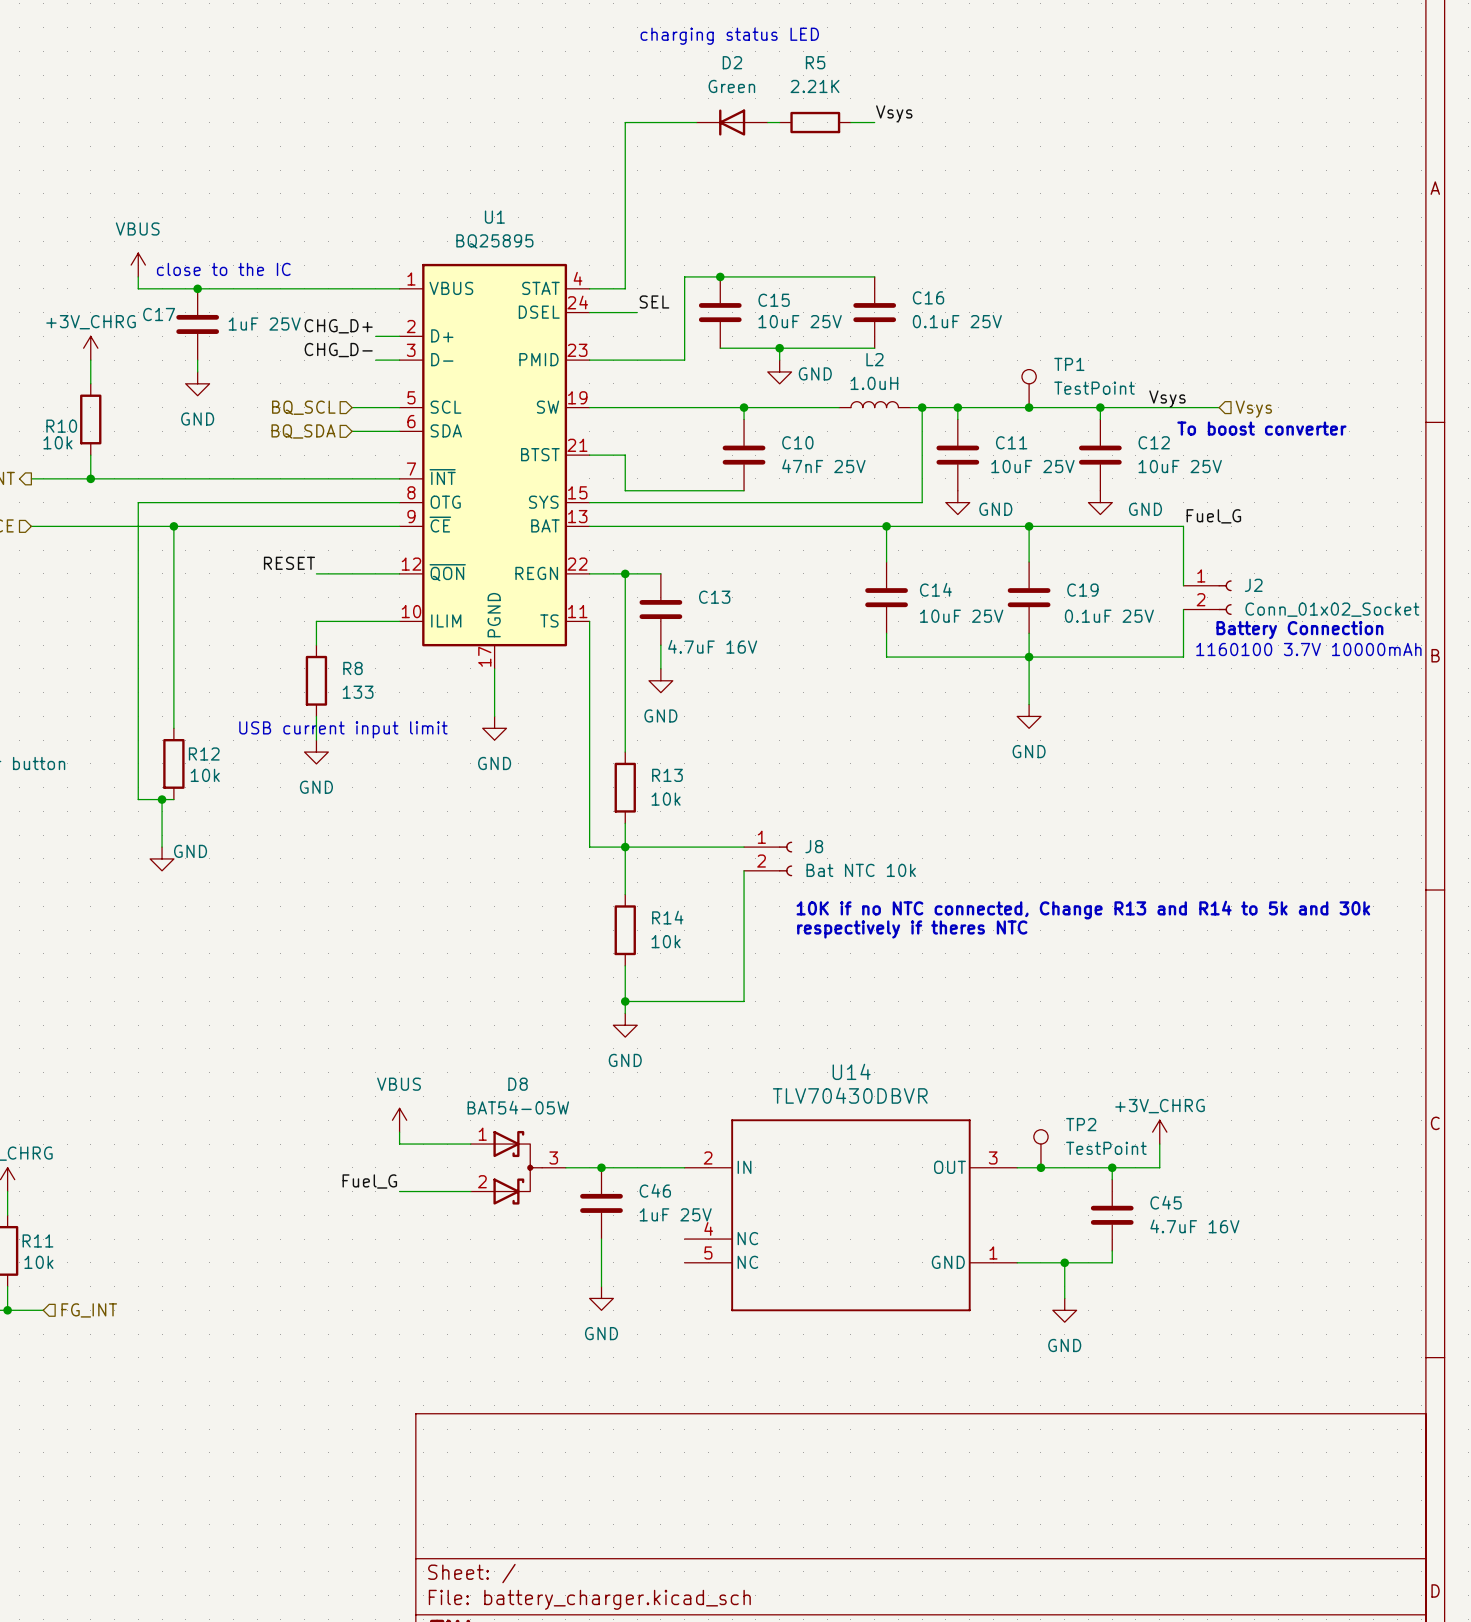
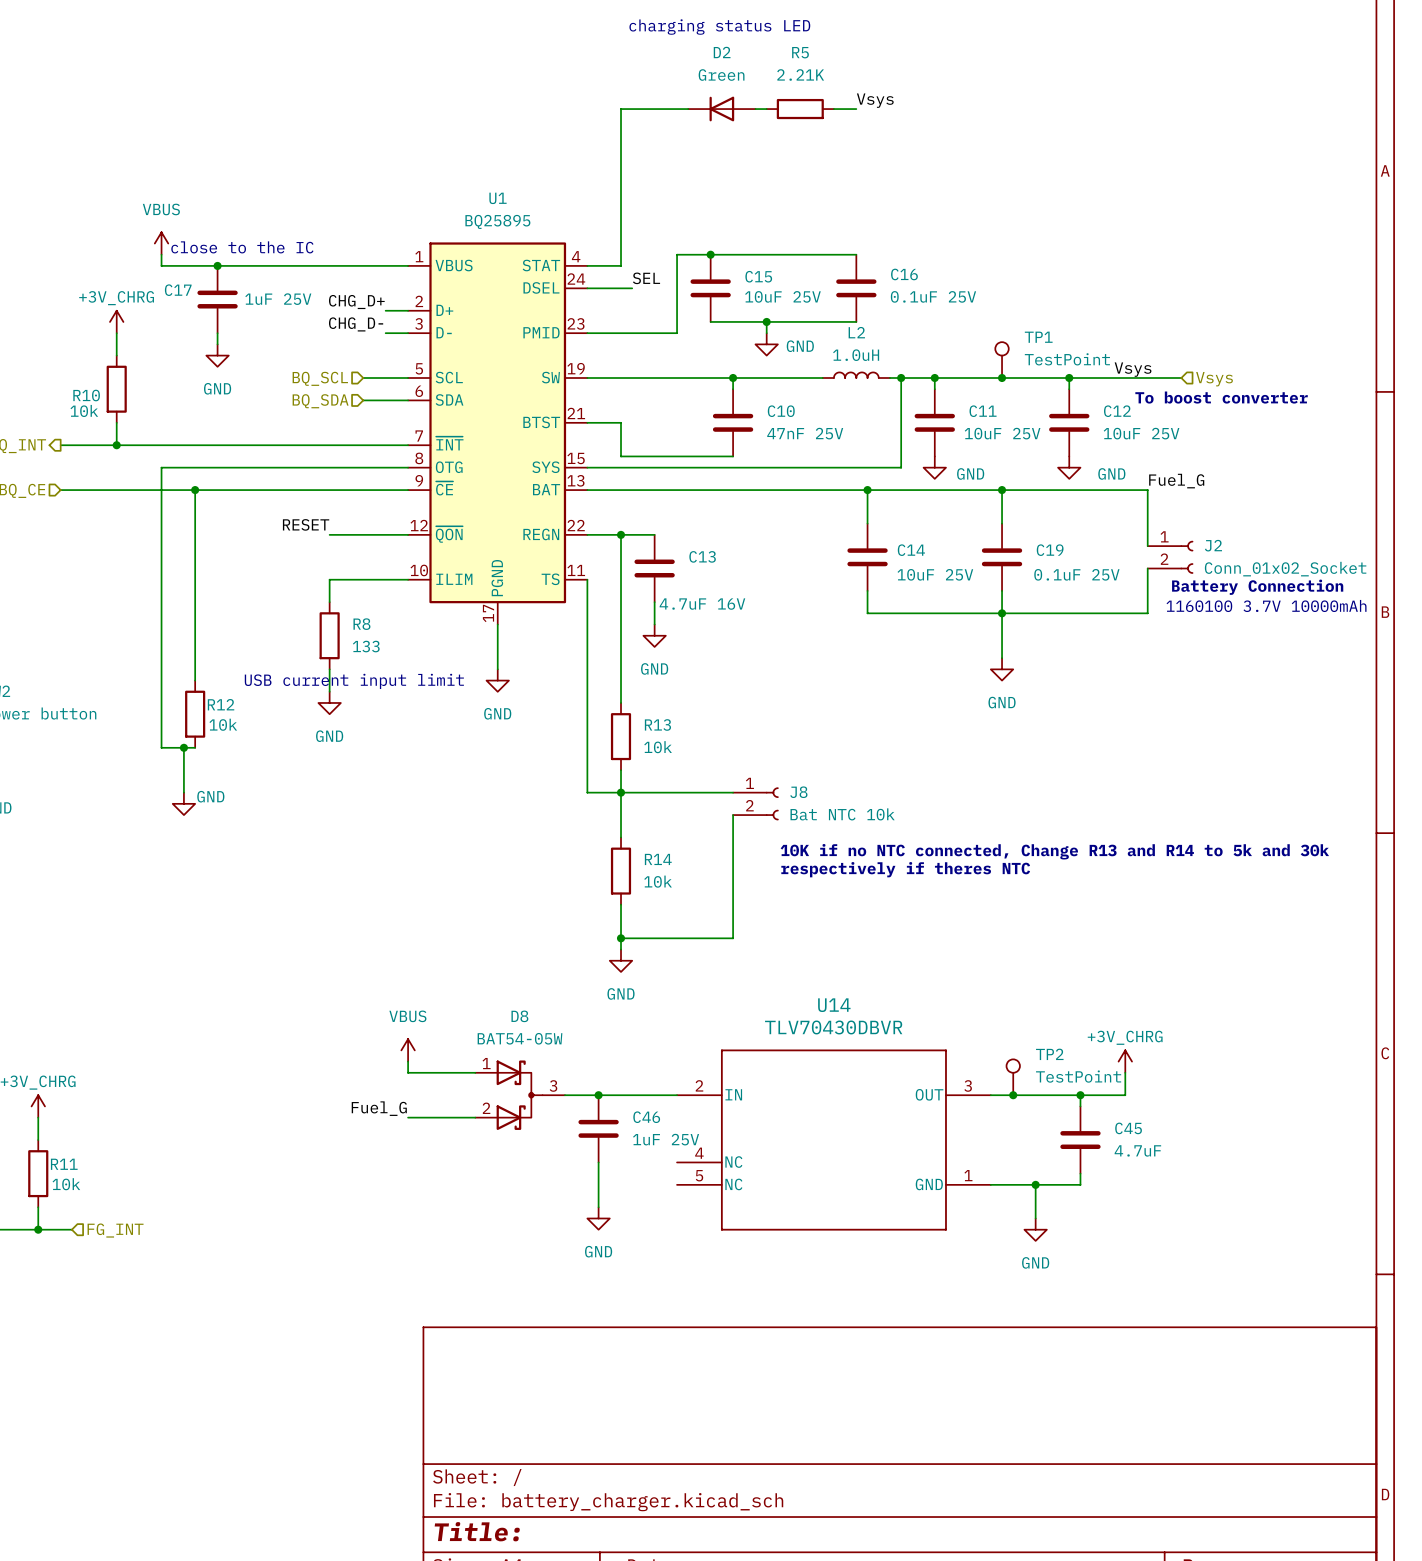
C45 value: 4.7uF 16V (1194, 1226) -> 4.7uF (1137, 1150)

